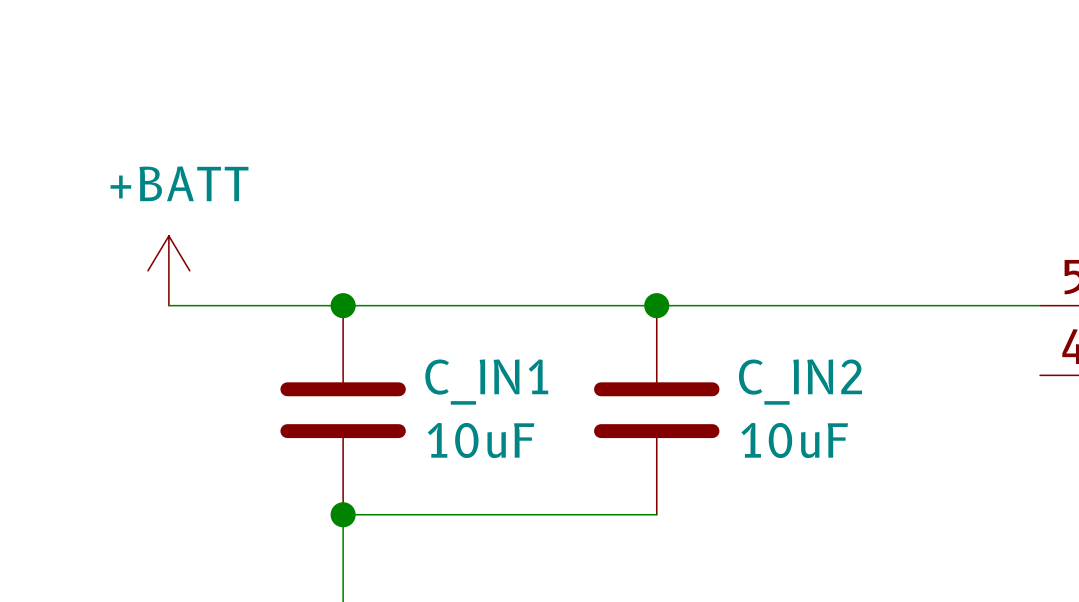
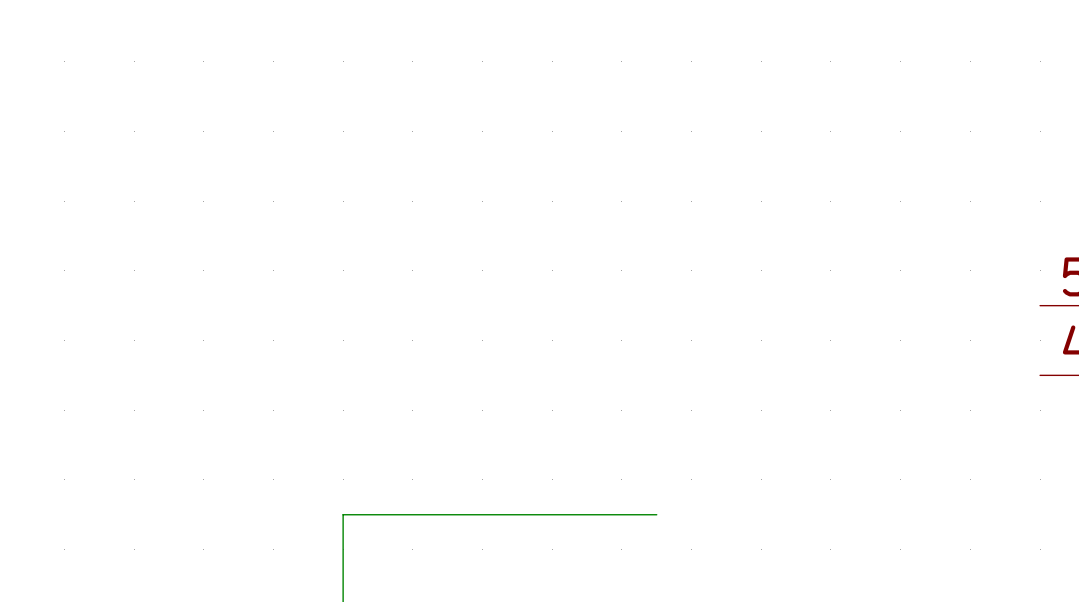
power symbol: +BATT (168, 270) -> none
wire: (168, 305) (1040, 305) -> none
junction: (343, 305) -> none
junction: (656, 305) -> none
C_IN1: 10uF (343, 410) -> none
C_IN2: 10uF (656, 410) -> none
junction: (343, 514) -> none

